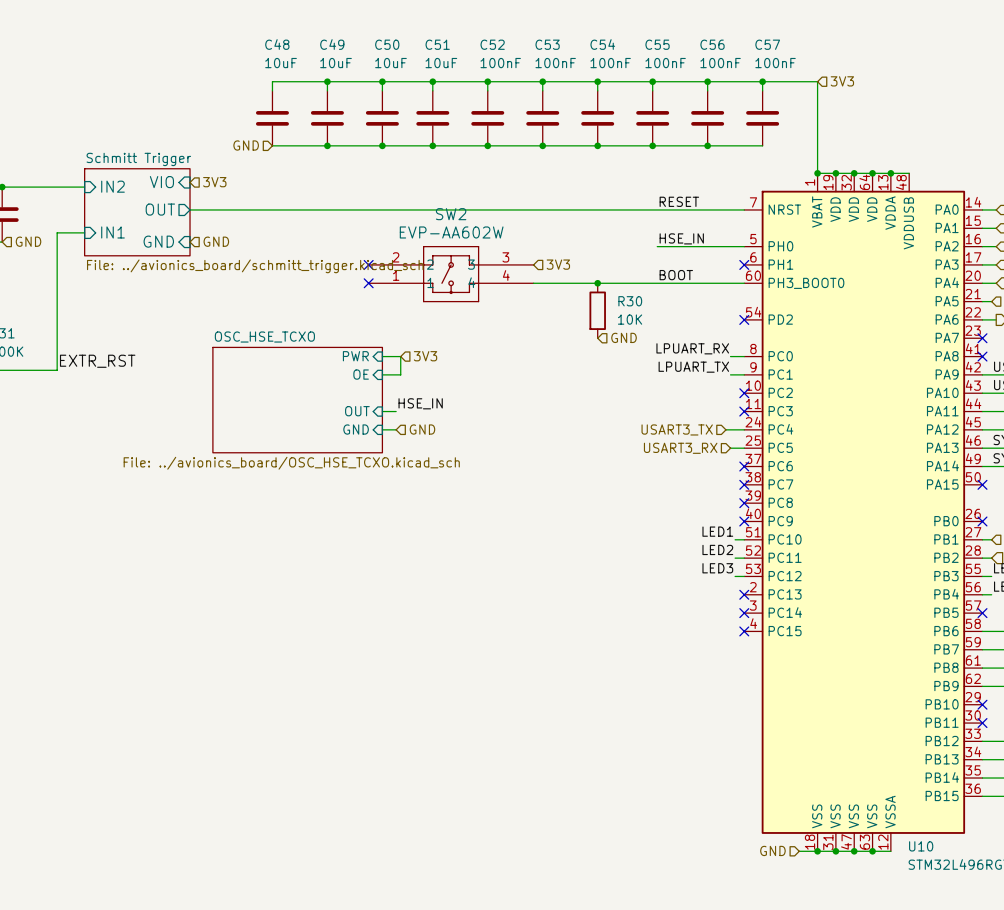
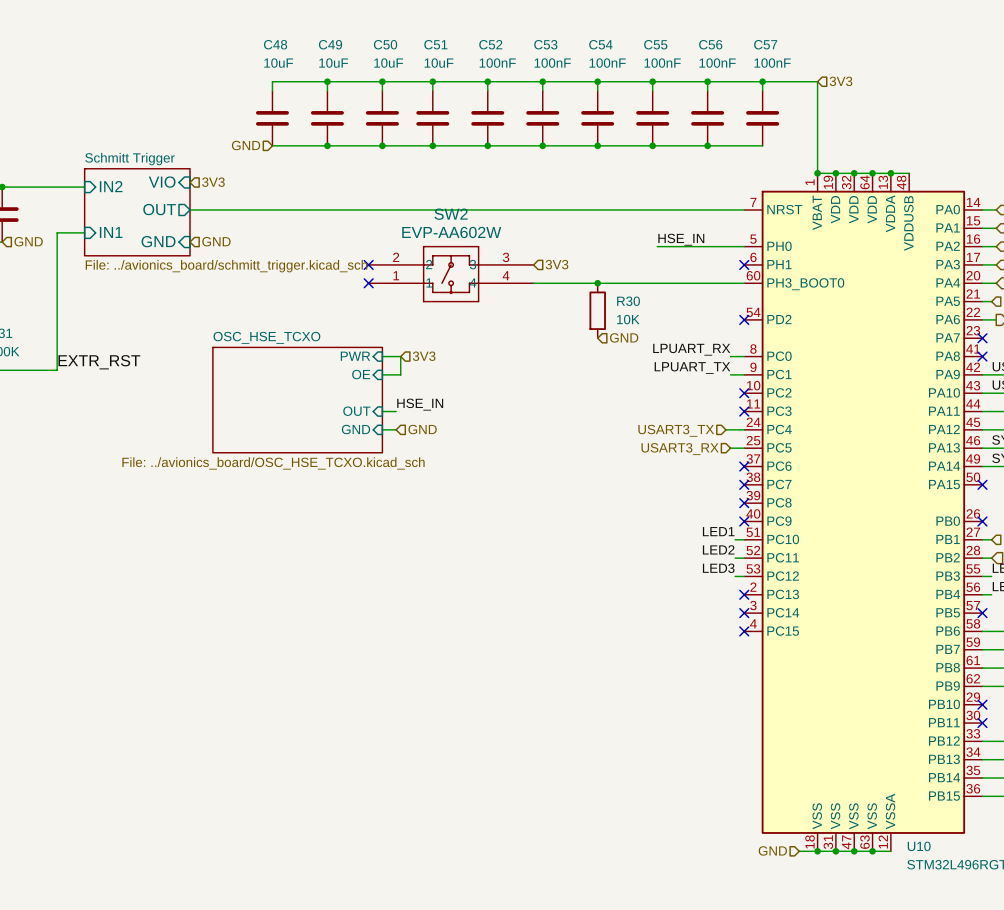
label: RESET (679, 201) -> none
label: BOOT (676, 275) -> none

